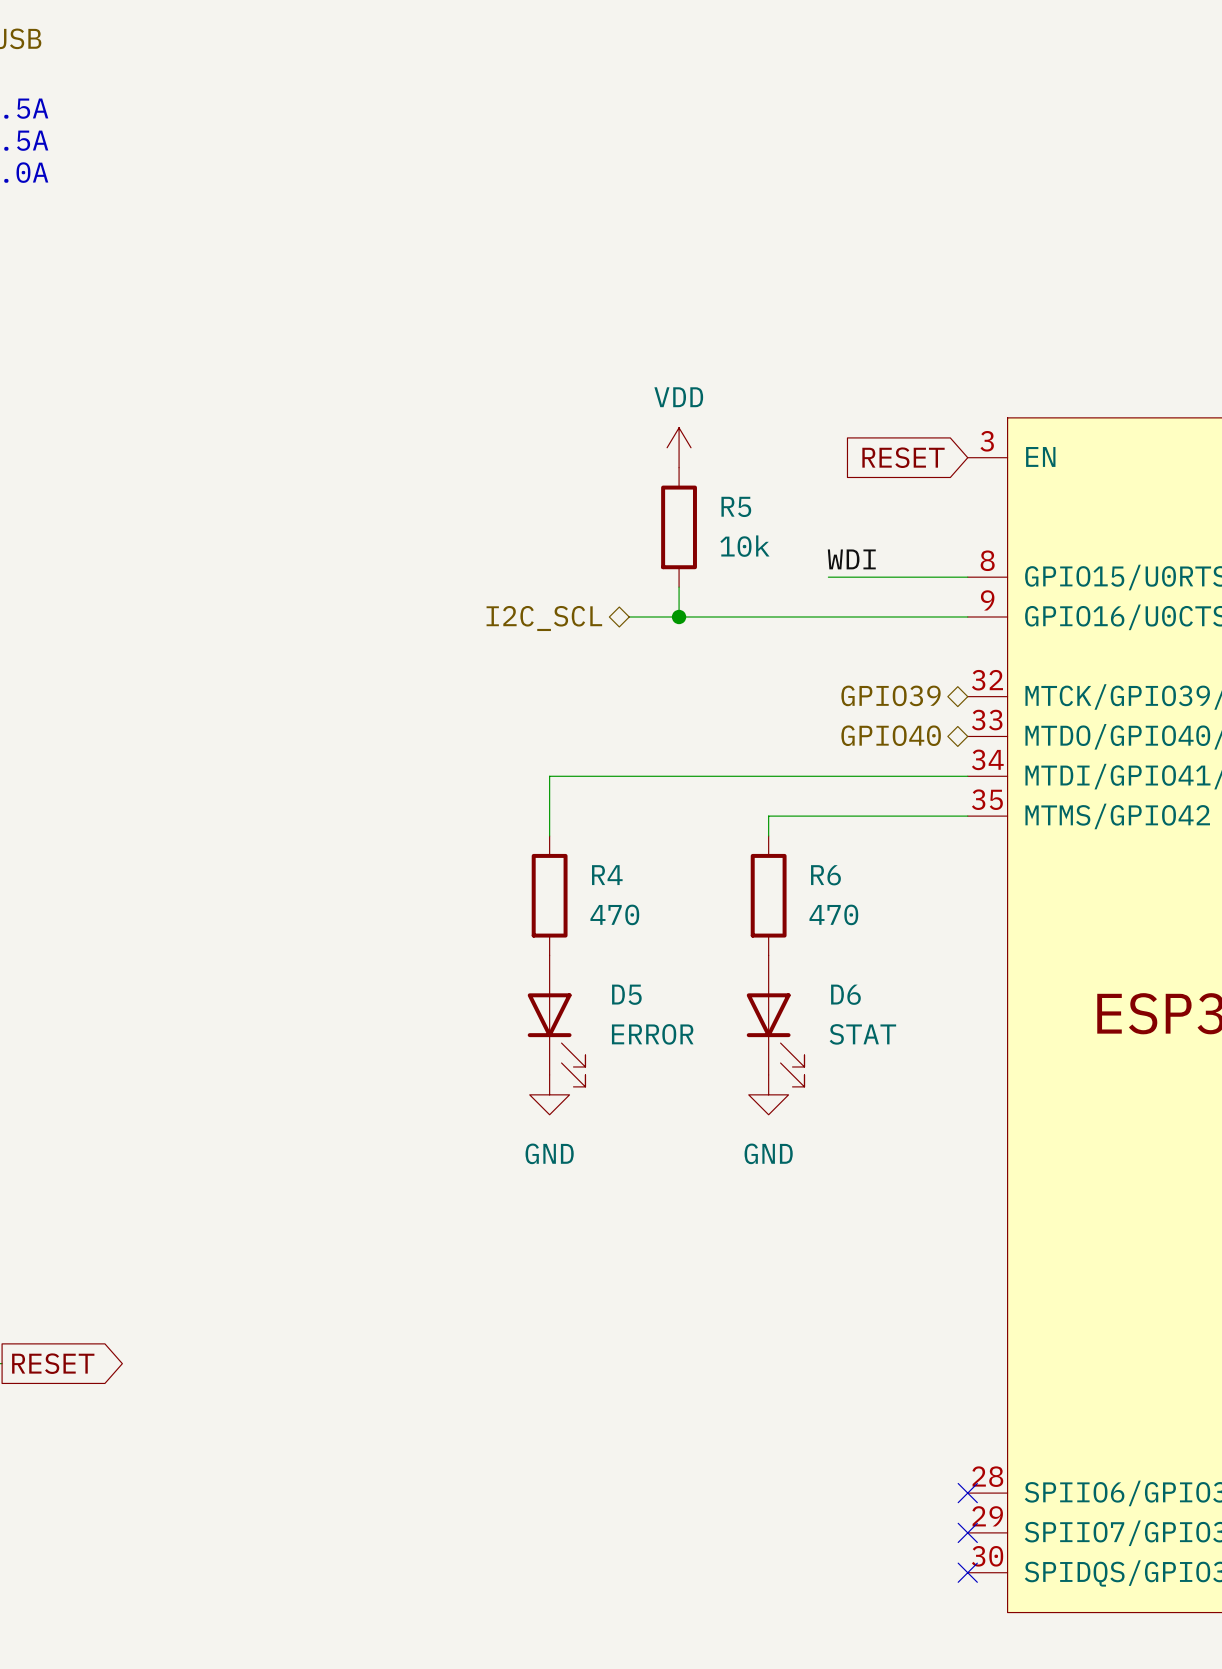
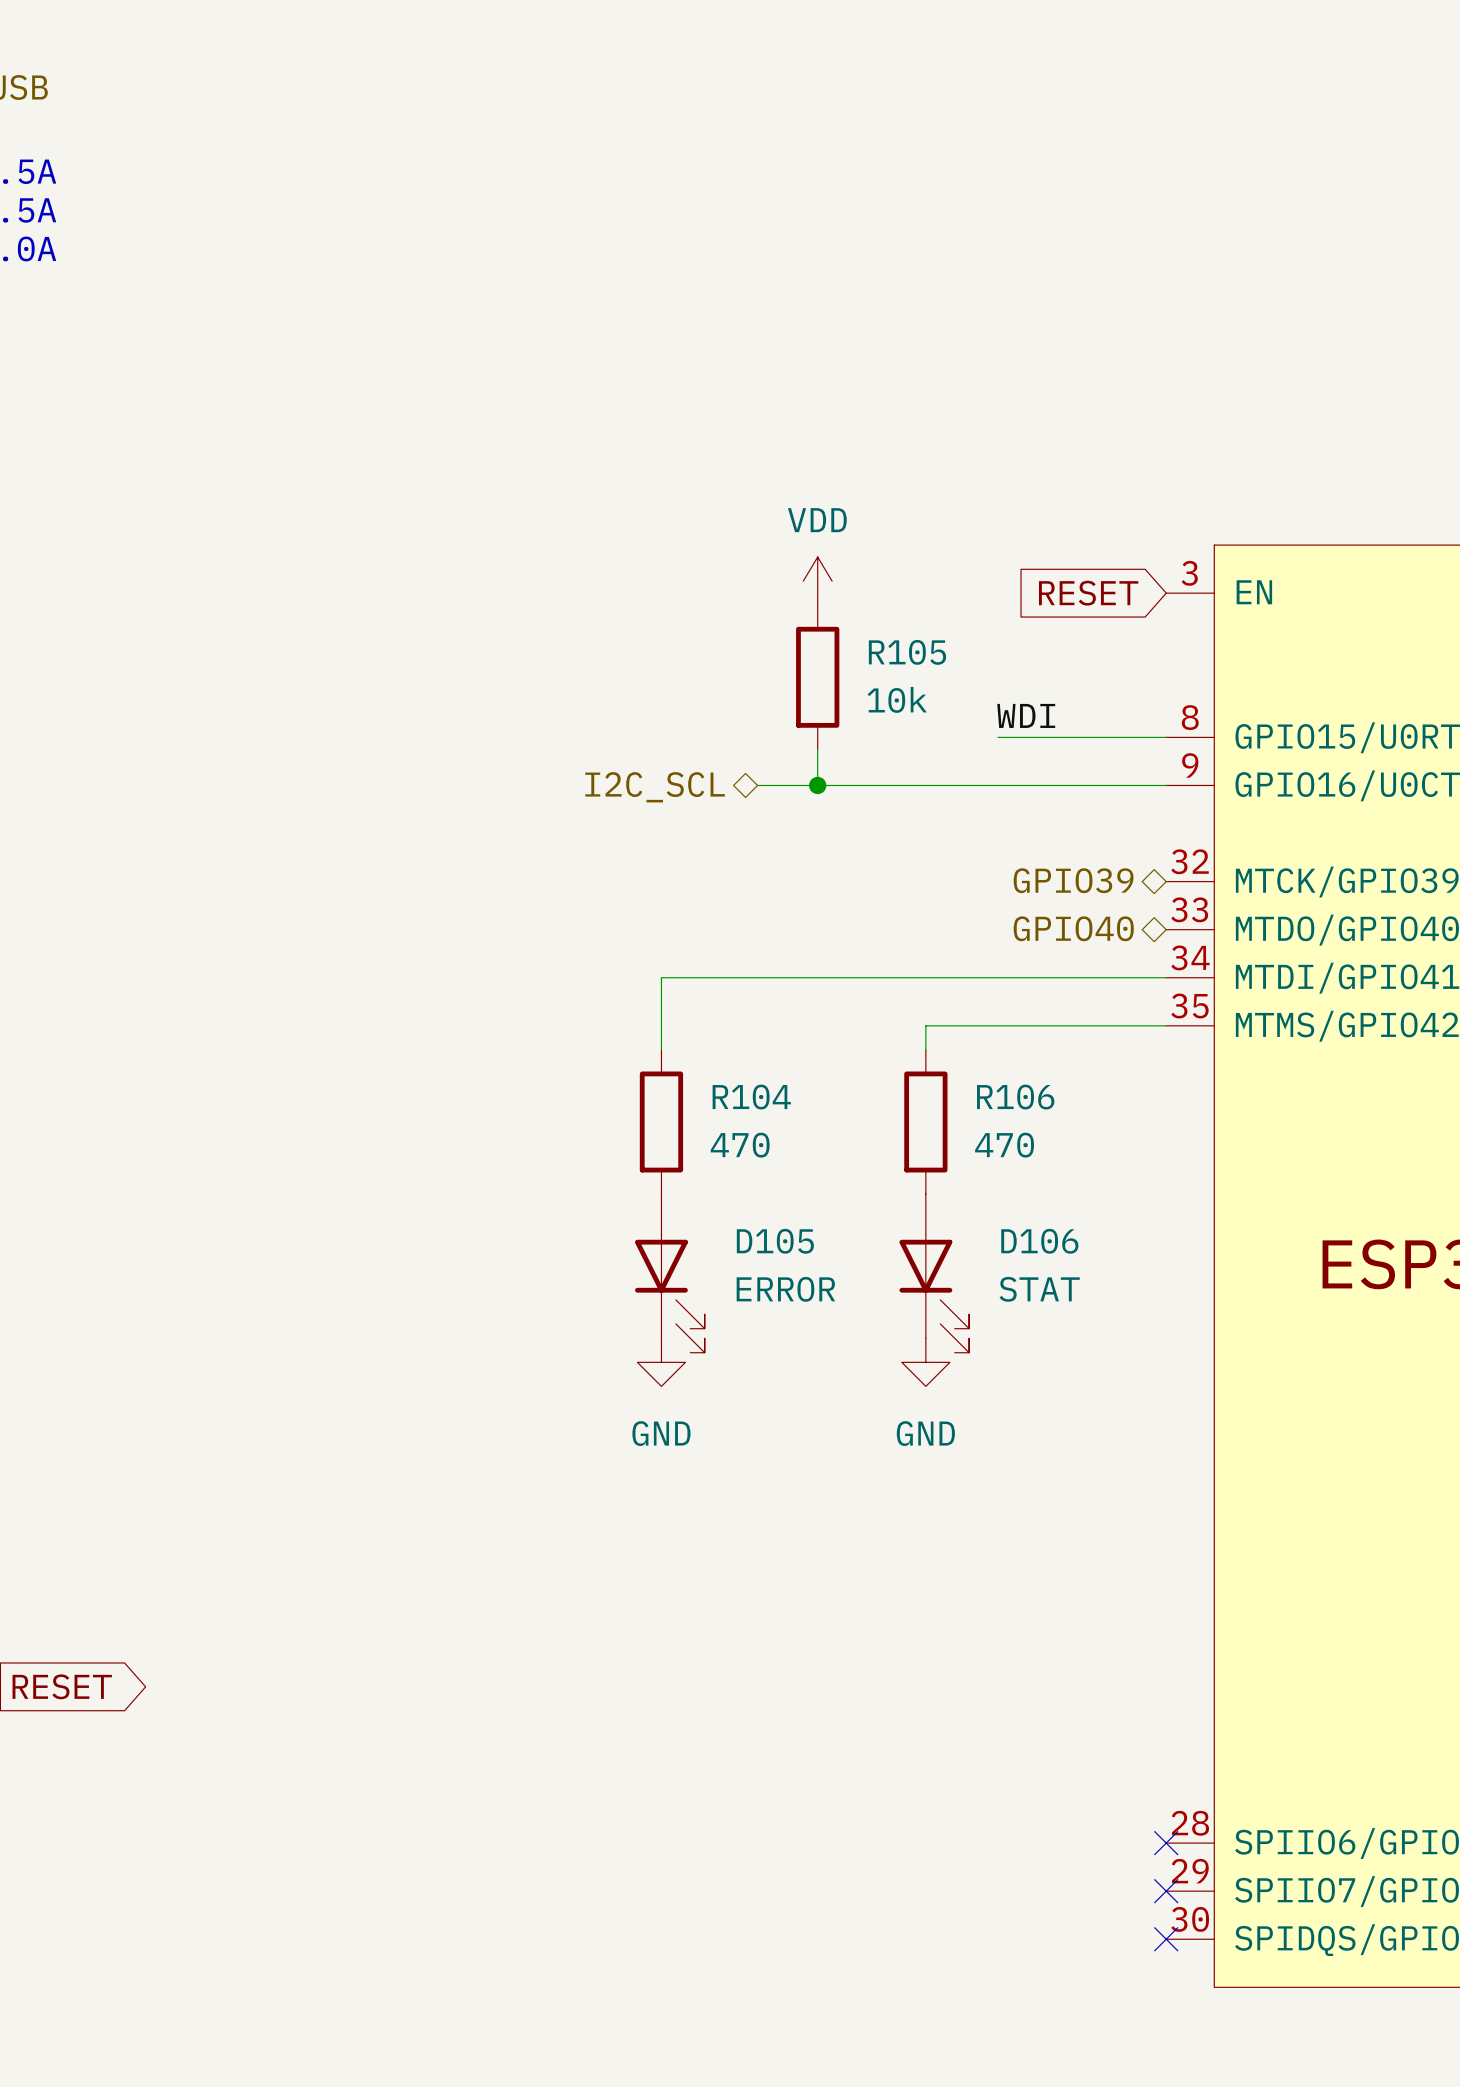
R5 name: R5 (736, 506) -> R105 (907, 652)
R4 name: R4 (607, 875) -> R104 (751, 1097)
R6 name: R6 (825, 875) -> R106 (1015, 1097)
D5 name: D5 (626, 994) -> D105 (775, 1241)
D6 name: D6 (845, 994) -> D106 (1039, 1241)

